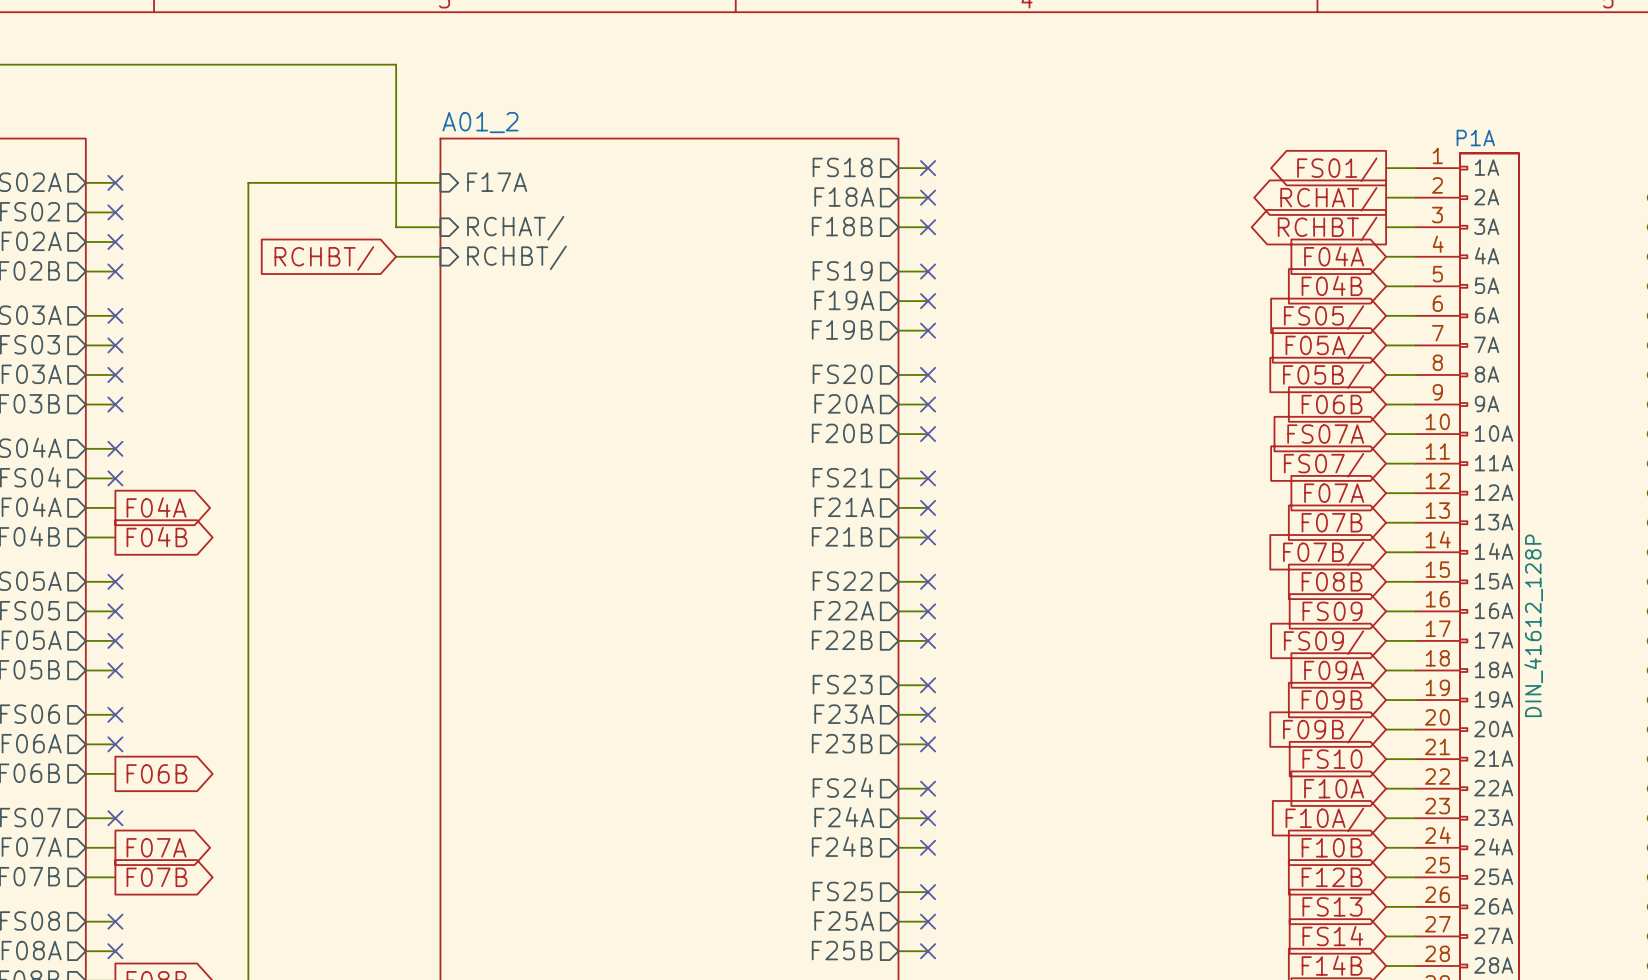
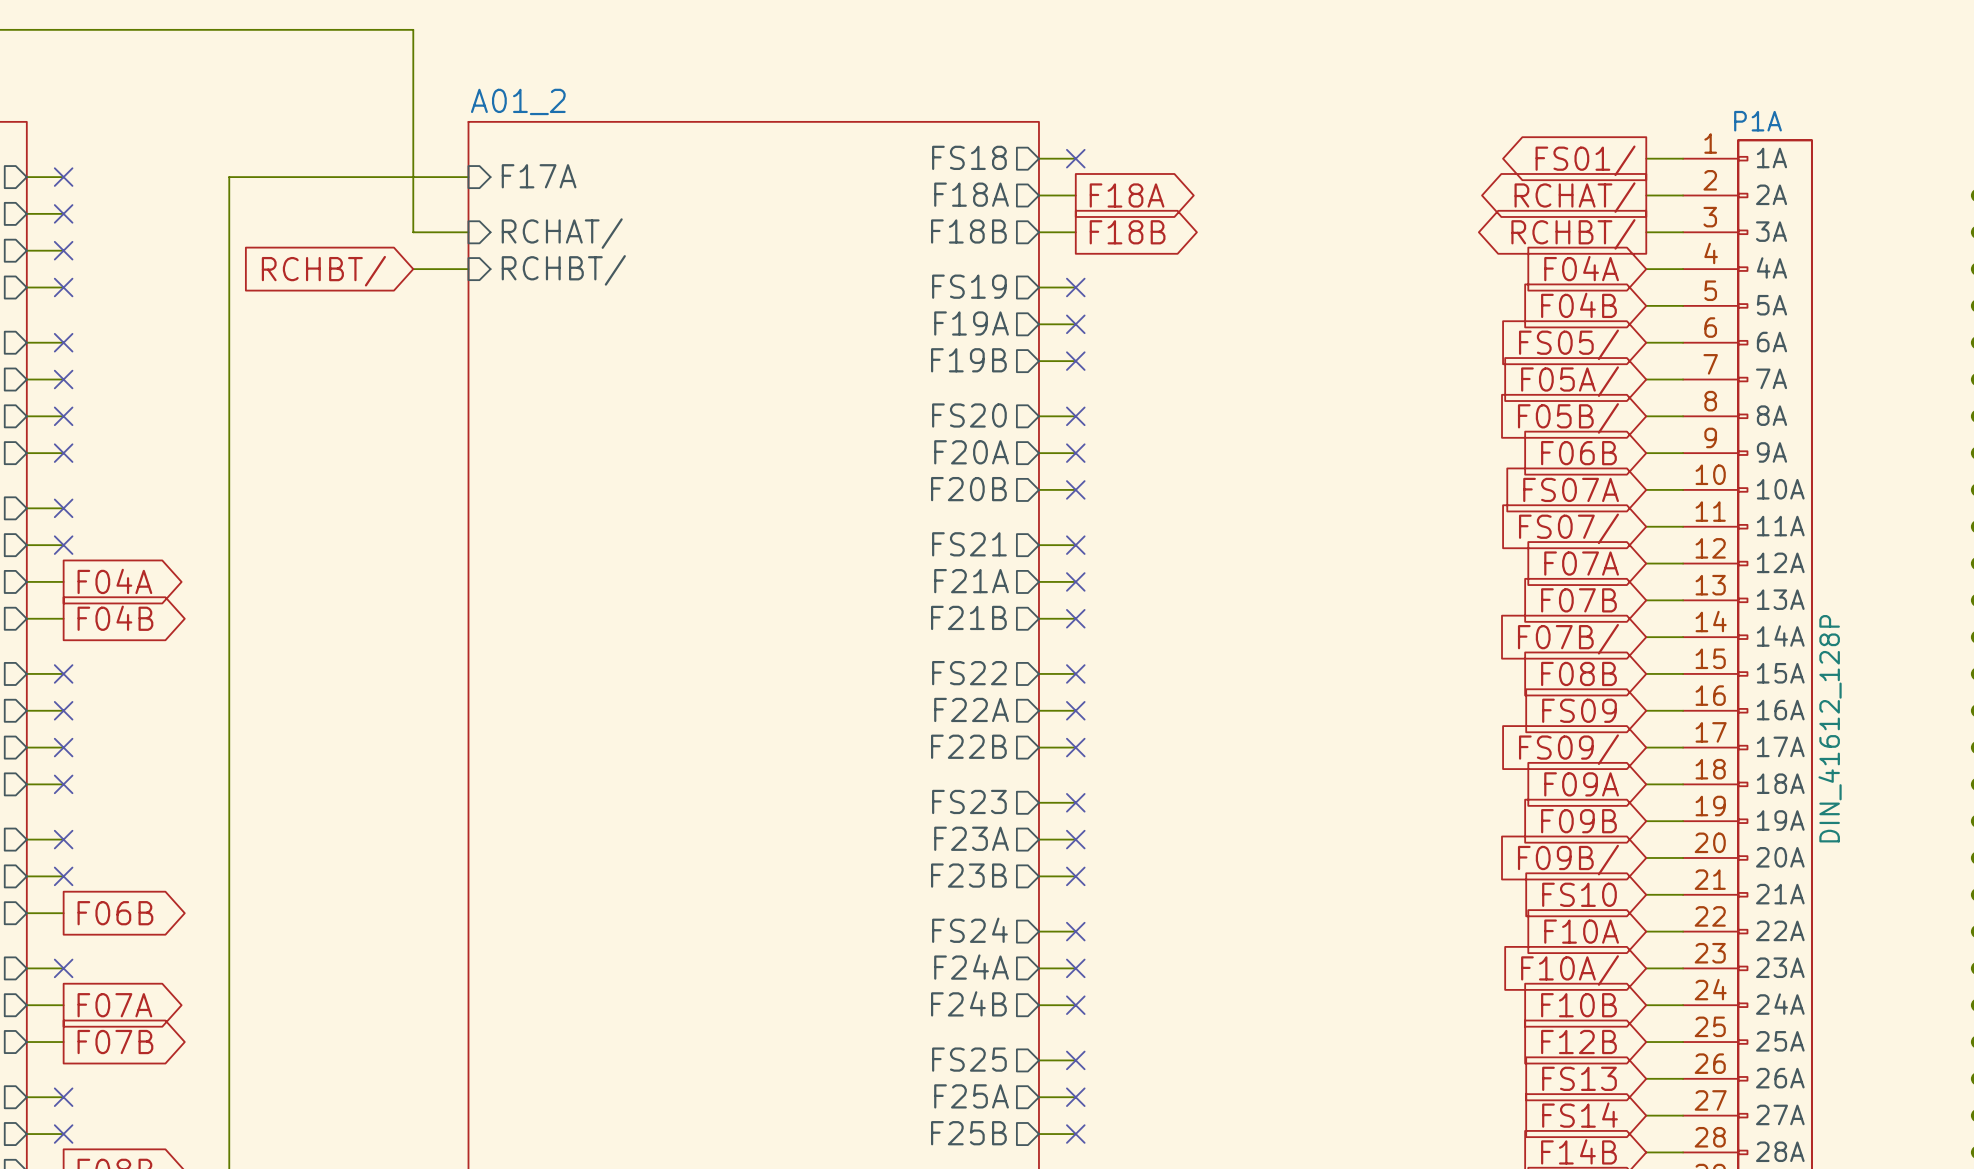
no-connect mark: (928, 197) -> none
global label: none -> F18A (1127, 195)
no-connect mark: (928, 227) -> none
global label: none -> F18B (1127, 232)

